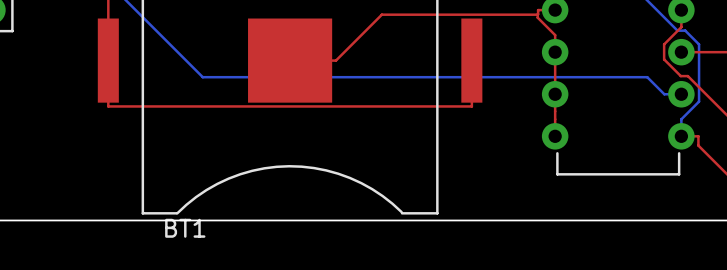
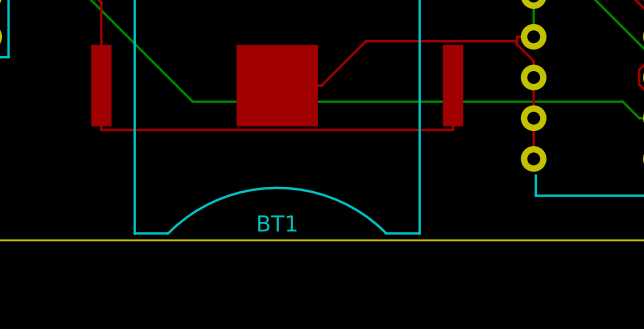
BT1 name position: BT1 (185, 228) -> BT1 (277, 223)

